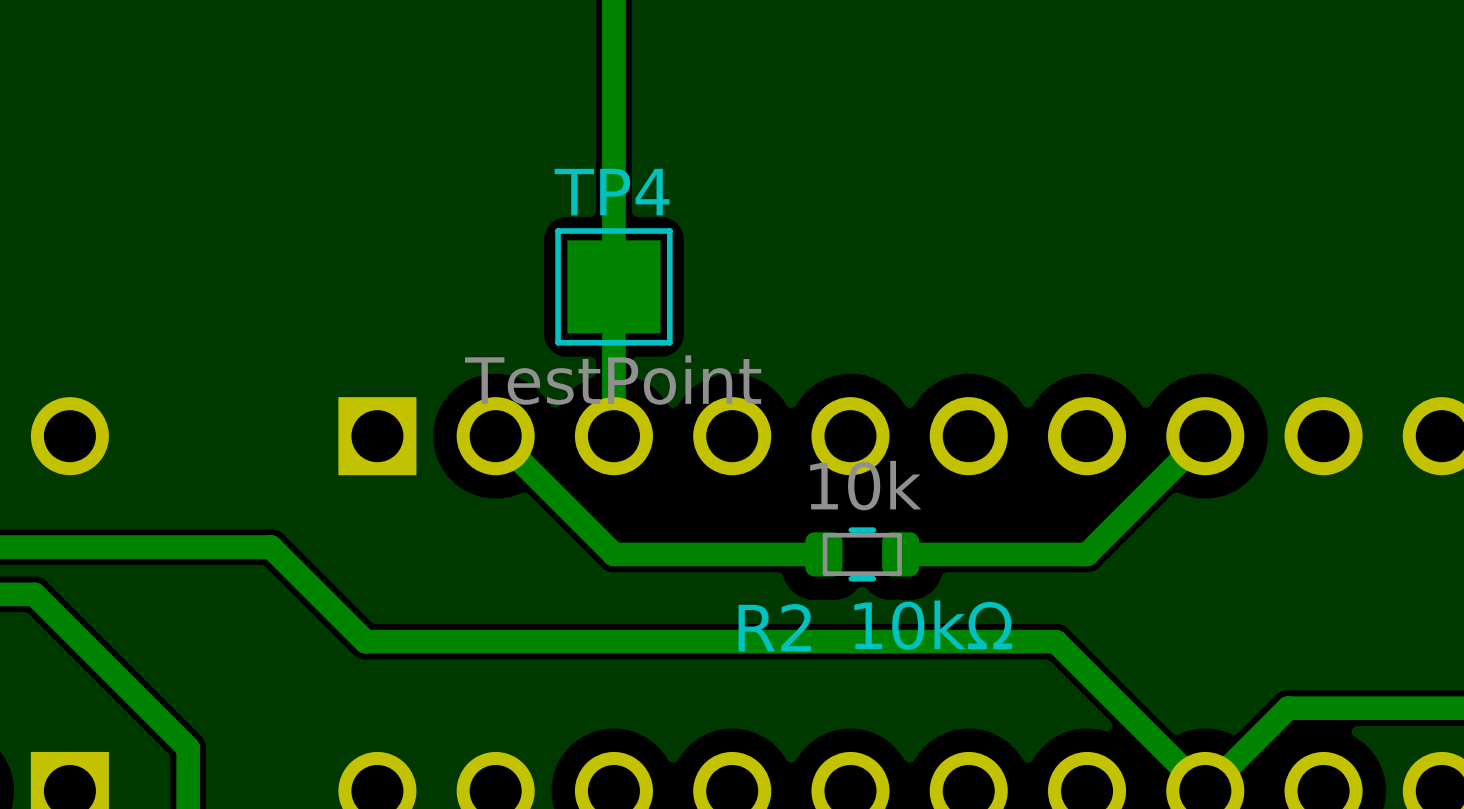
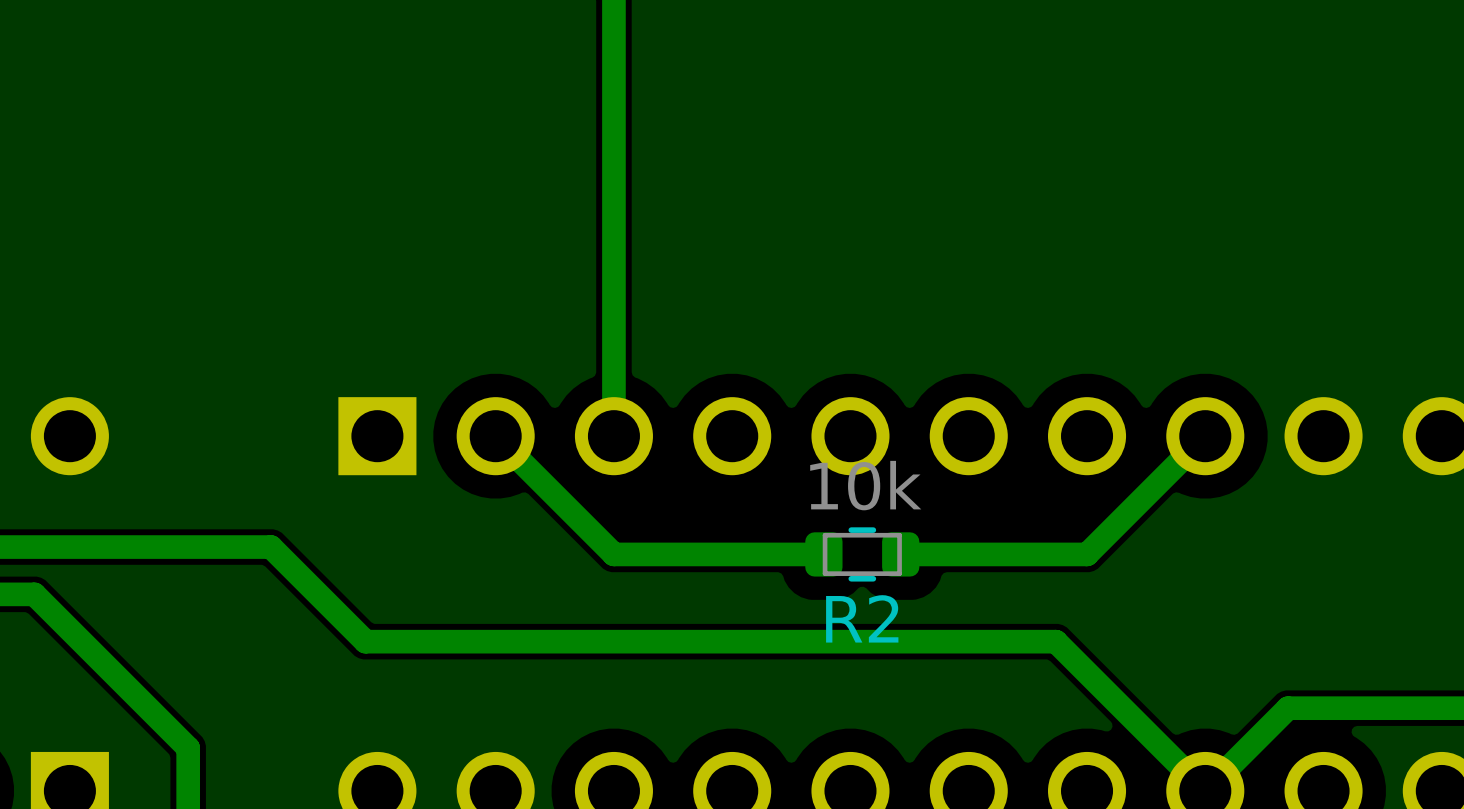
TP4: TestPoint (613, 286) -> none
text: 10kΩ (933, 625) -> none
R2 name position: R2 (774, 627) -> R2 (862, 618)

